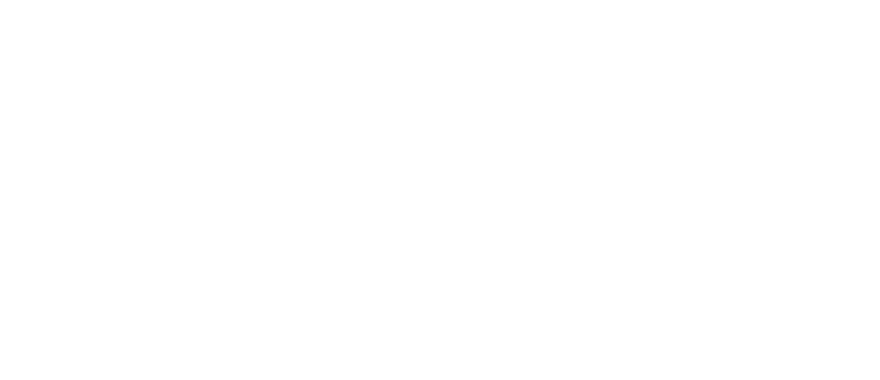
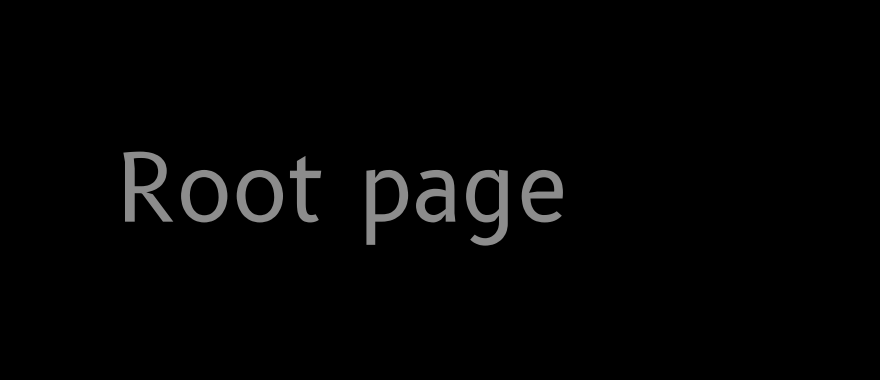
text: none -> Root page (343, 198)

